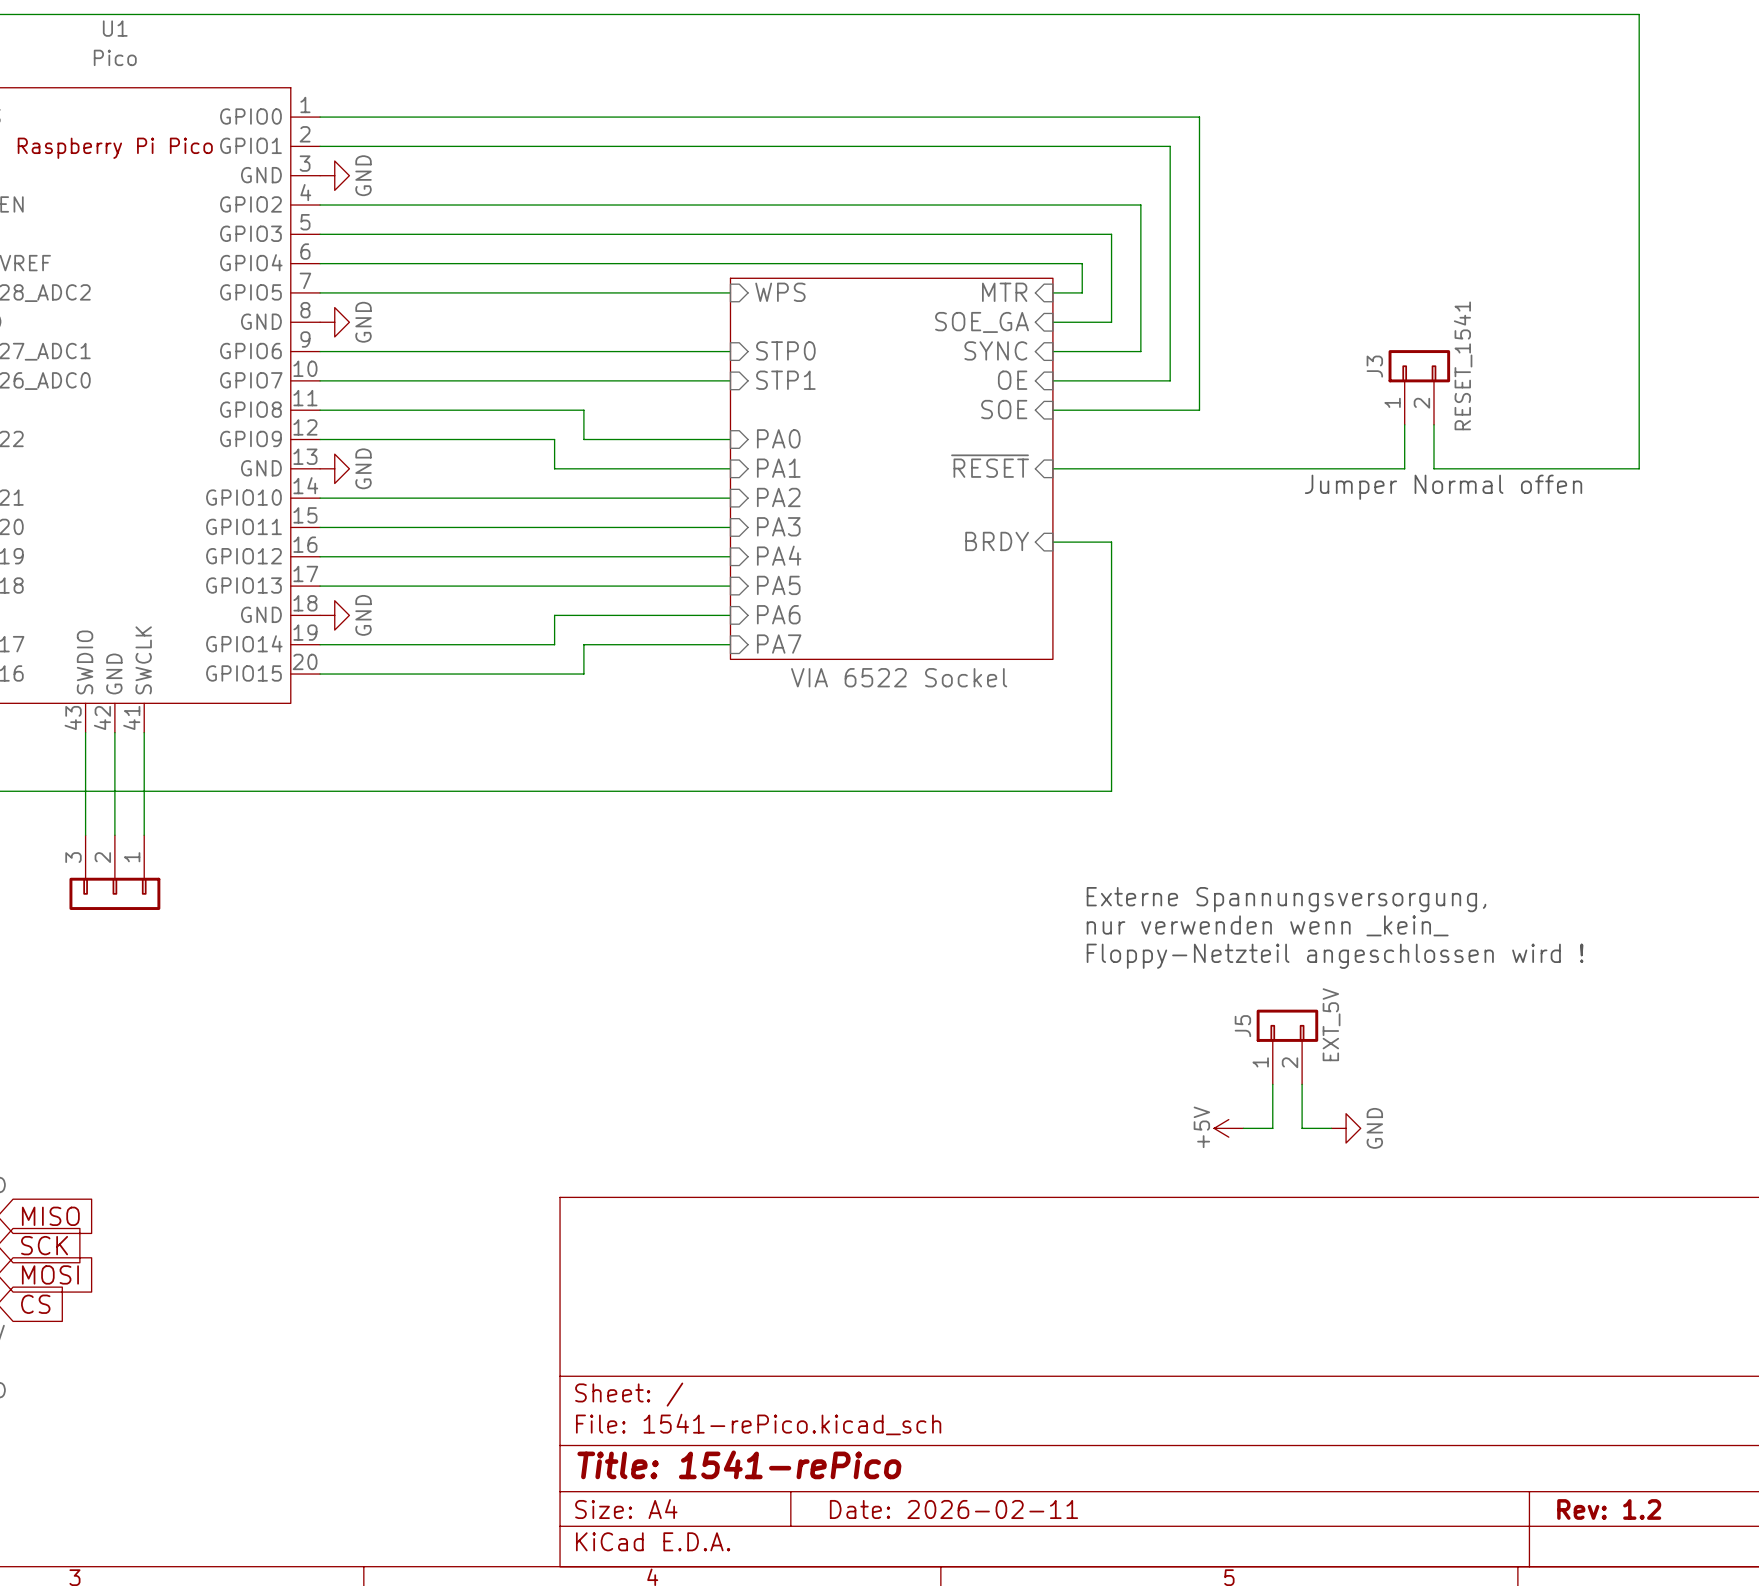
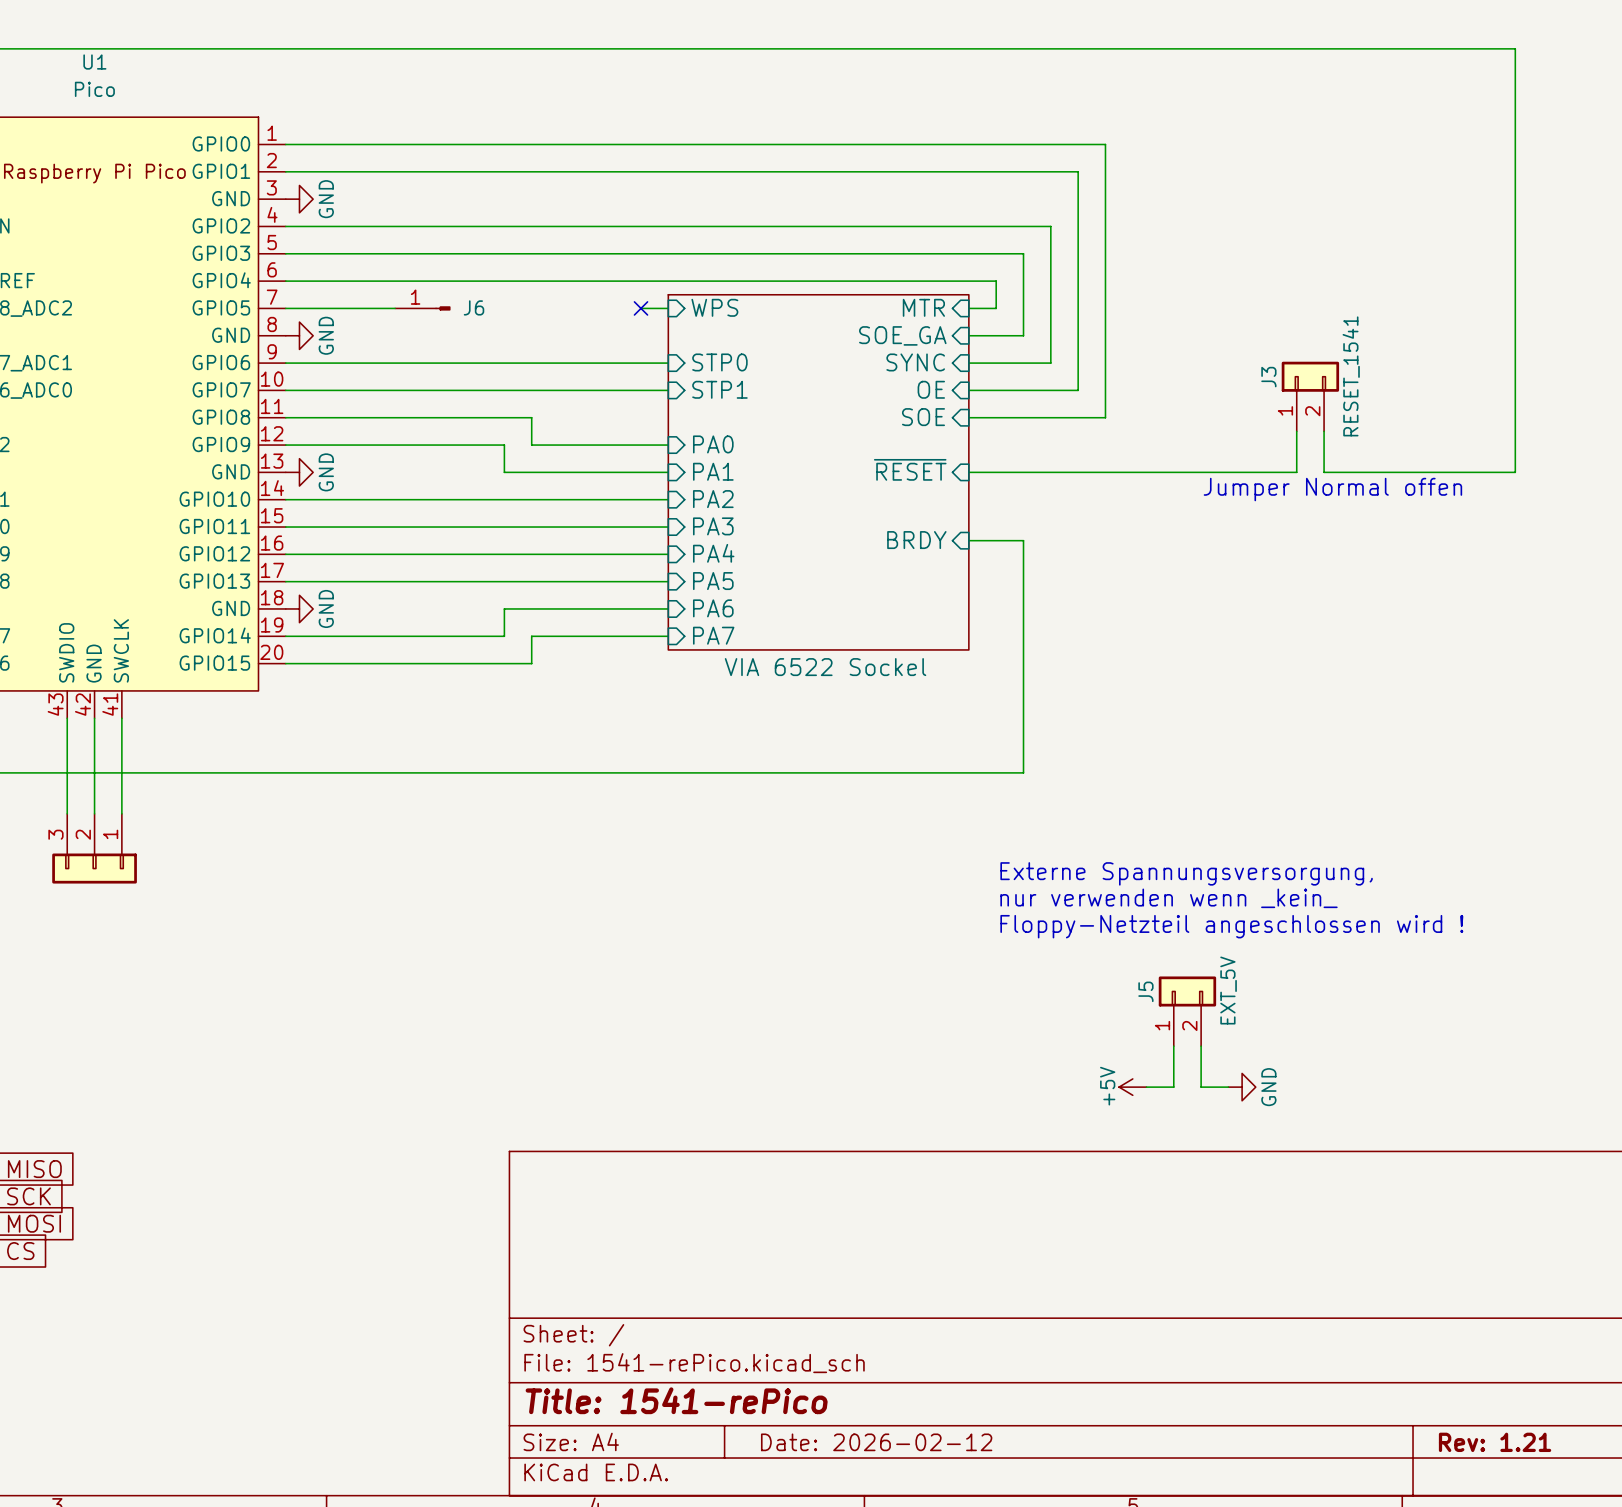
wire: (437, 292) (701, 292) -> none
J6: none -> (422, 308)
no-connect mark: none -> (641, 308)
title block: Date: 2026-02-11 (953, 1509) -> Date: 2026-02-12 (876, 1442)
title block: Rev: 1.2 (1609, 1509) -> Rev: 1.21 (1495, 1442)

